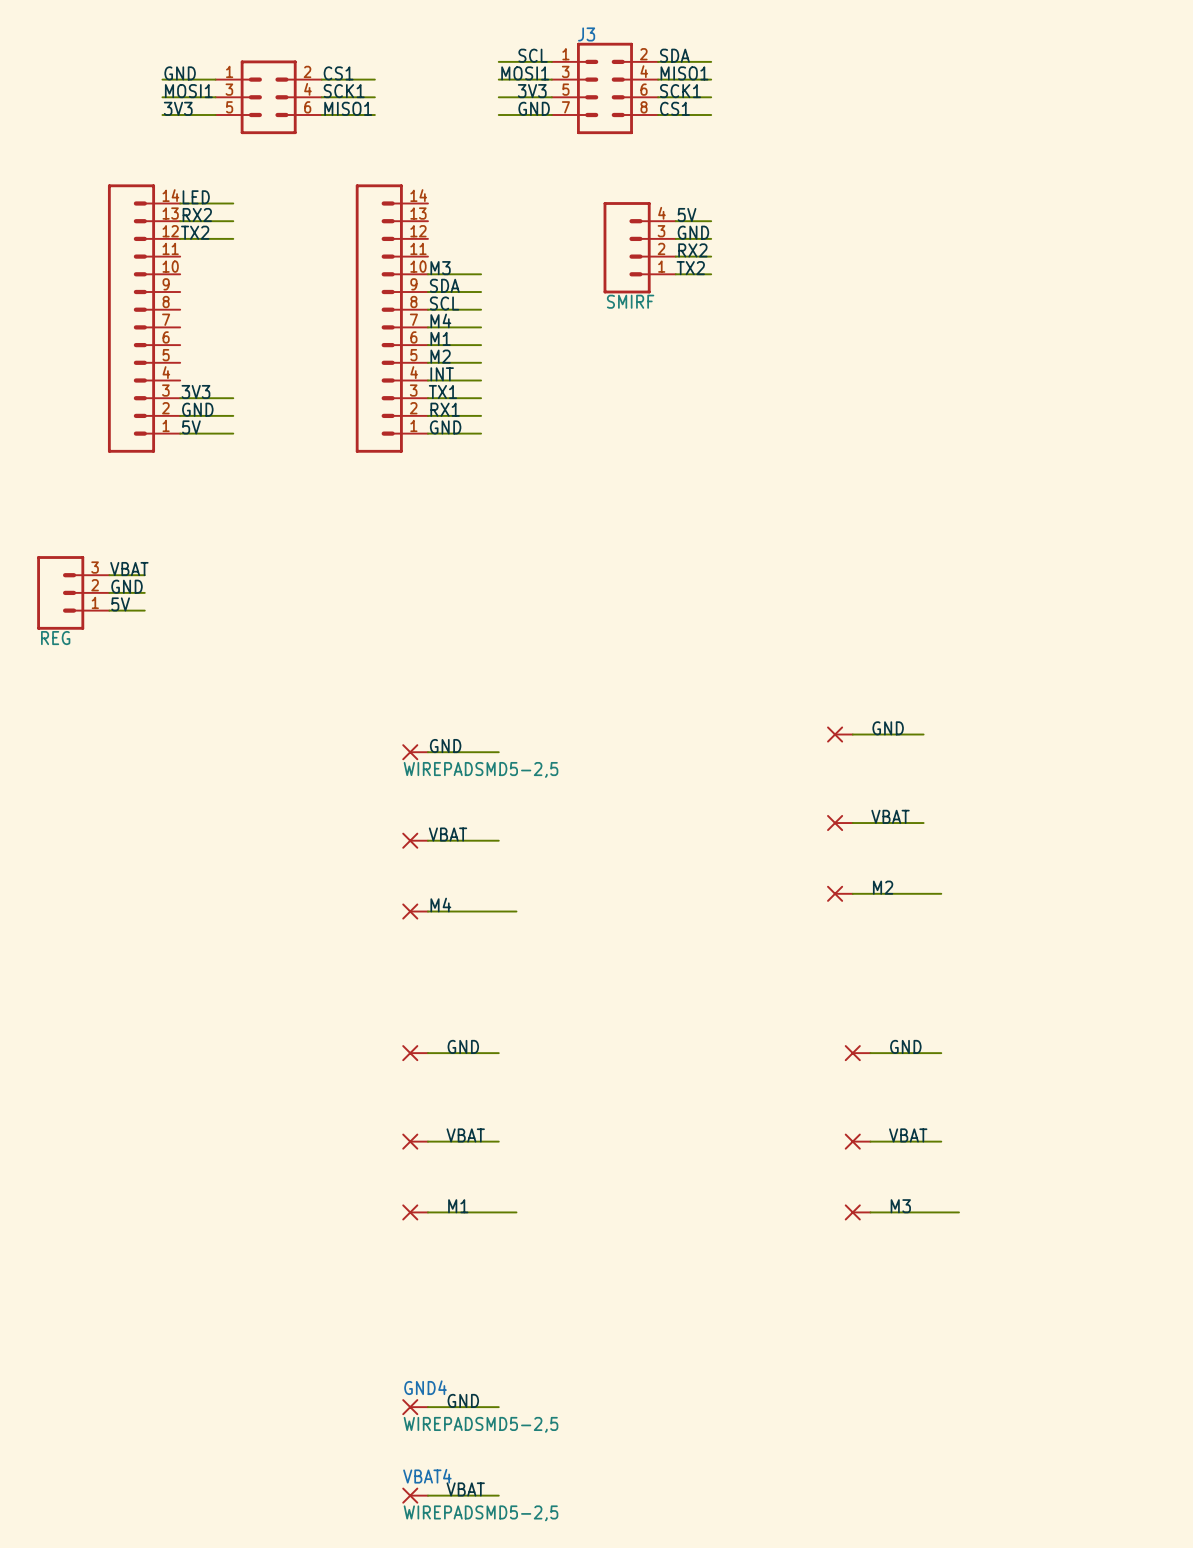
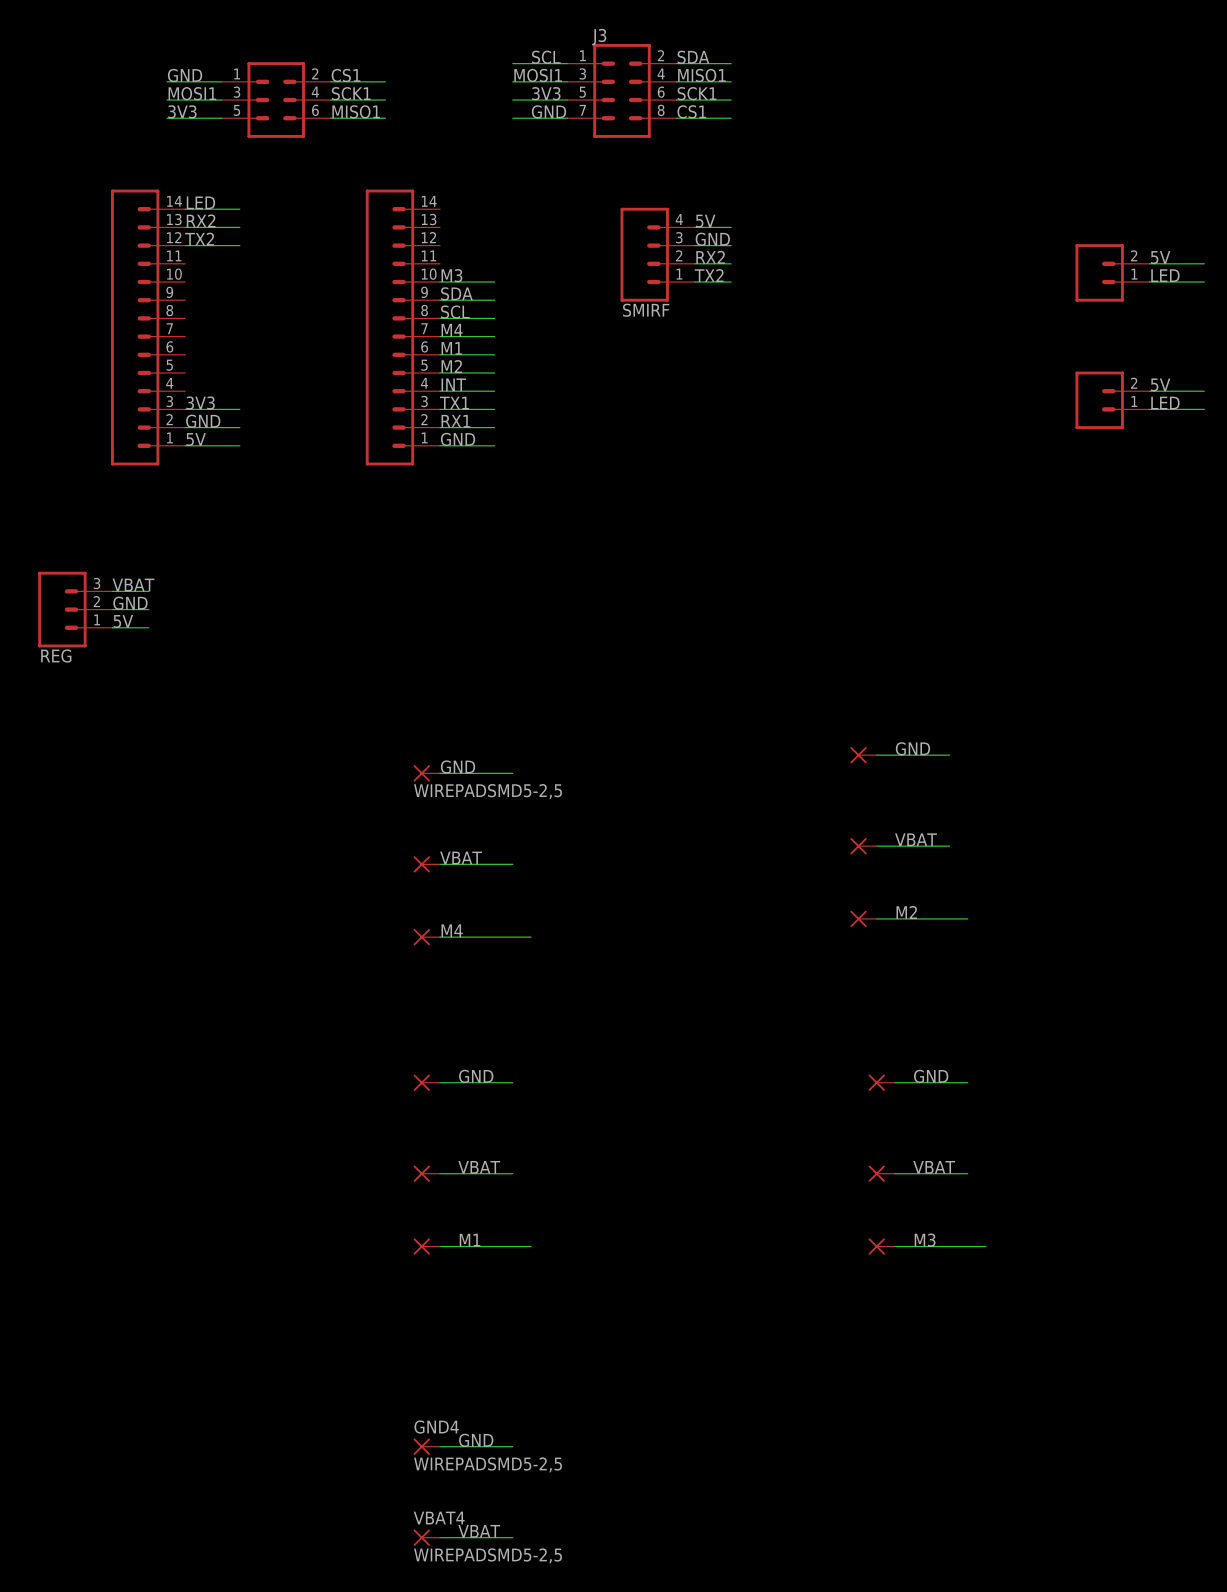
label: none -> 5V (1160, 257)
wire: none -> (1149, 263) (1204, 263)
part: none -> (1112, 272)
label: none -> LED (1165, 275)
wire: none -> (1149, 282) (1204, 282)
label: none -> 5V (1160, 384)
wire: none -> (1149, 391) (1204, 391)
part: none -> (1112, 400)
label: none -> LED (1165, 403)
wire: none -> (1149, 409) (1204, 409)

